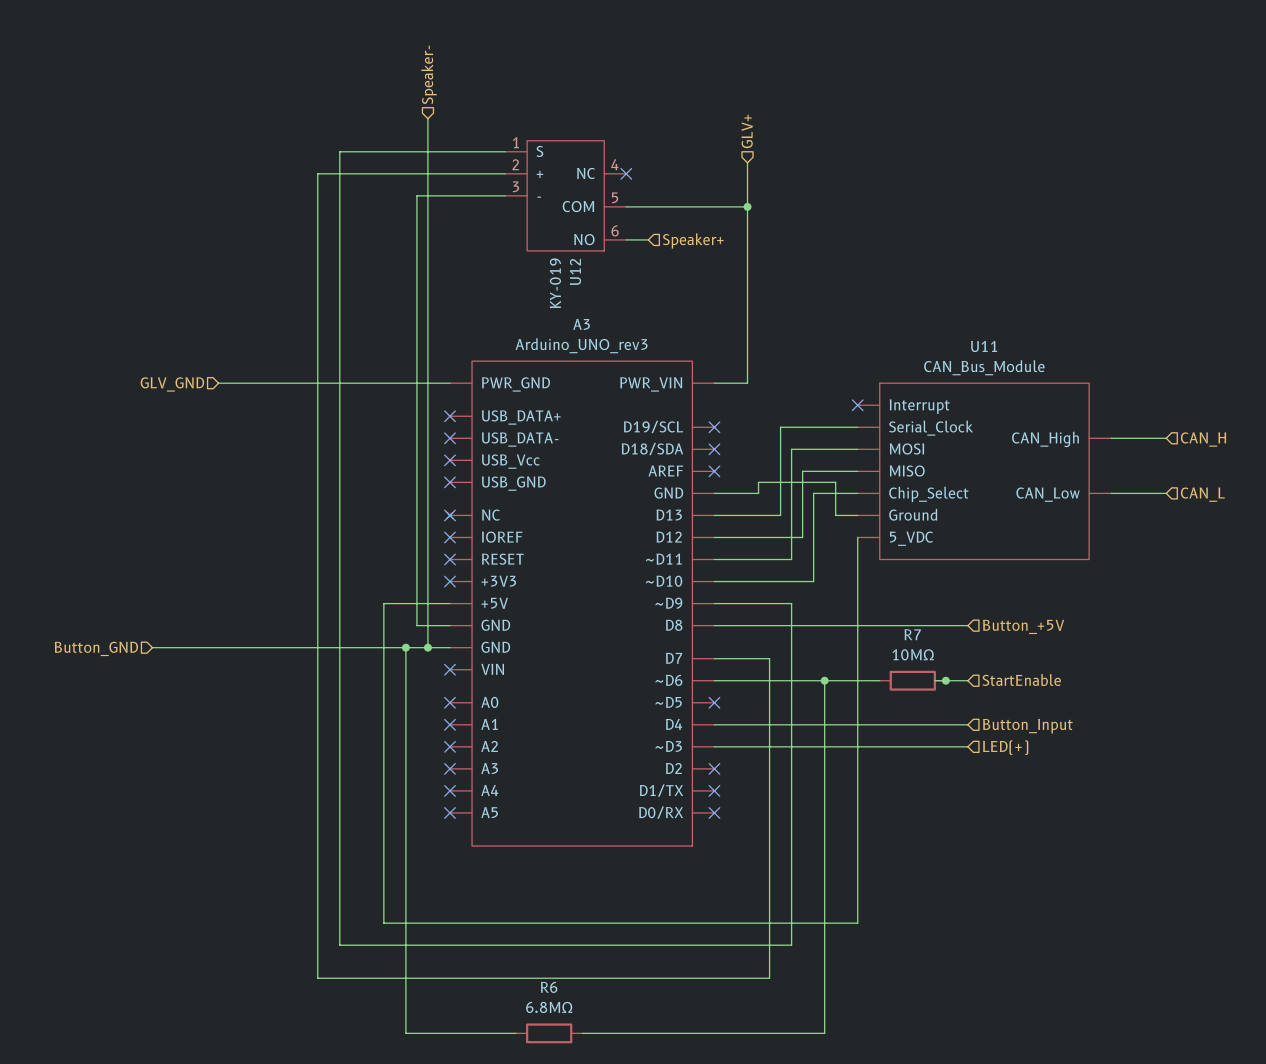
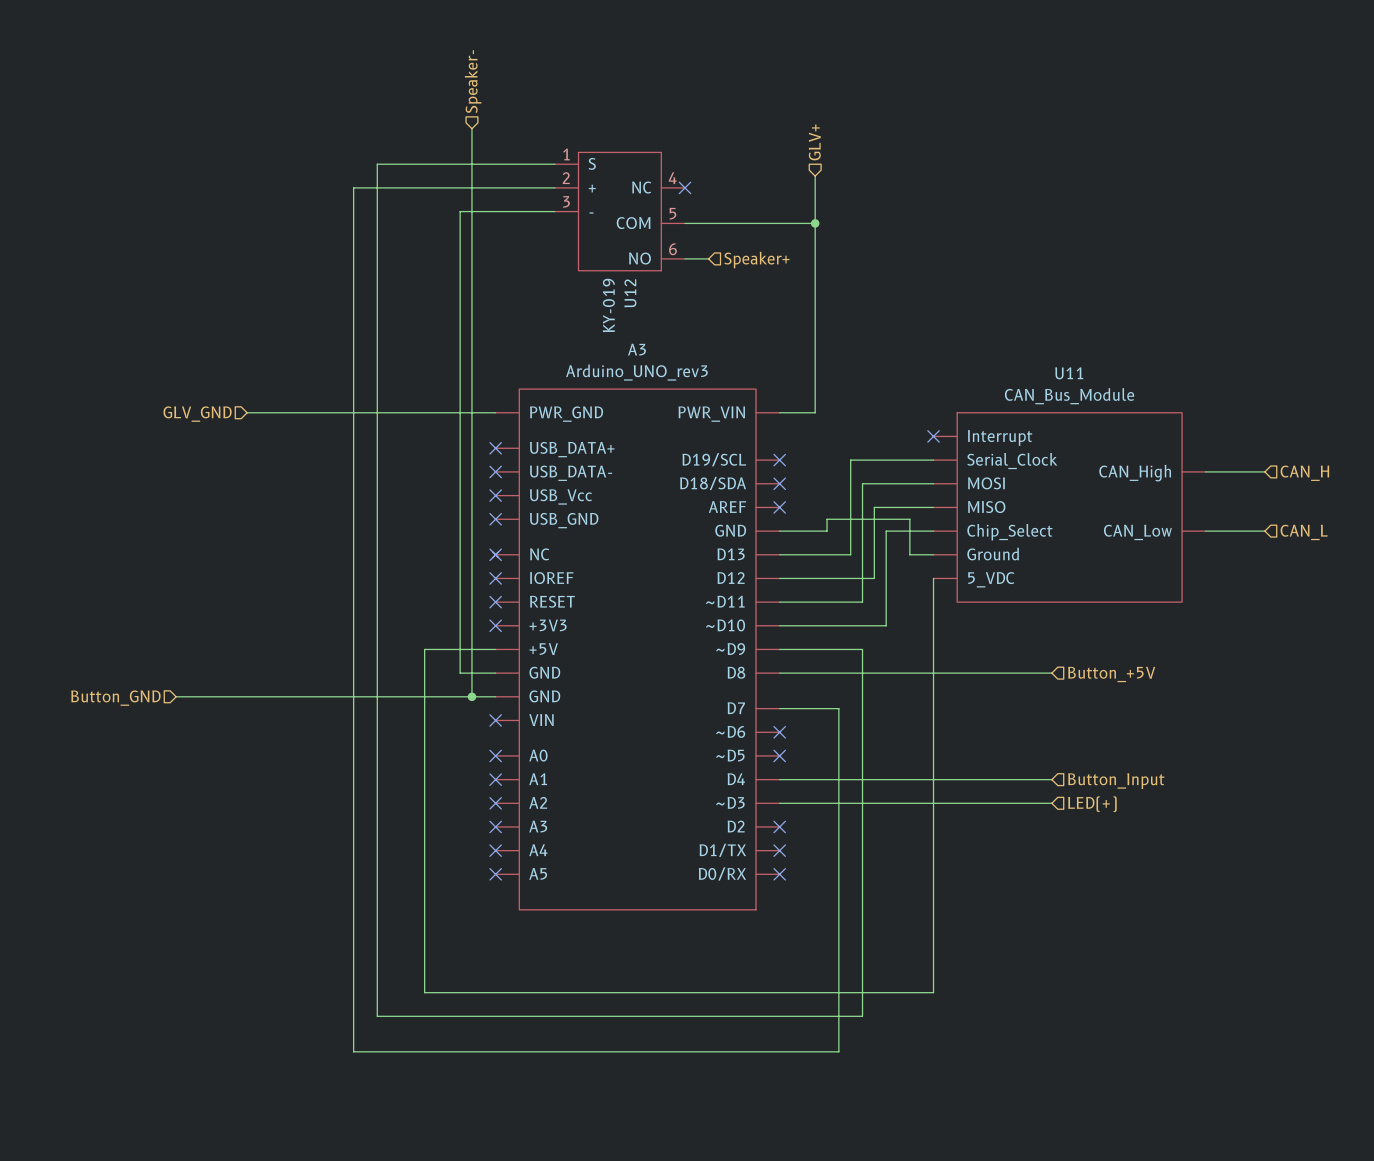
wire: (405, 647) (405, 1033) (516, 1033) -> none
junction: (405, 647) -> none
wire: (714, 680) (879, 680) -> none
no-connect mark: none -> (779, 732)
wire: (824, 680) (824, 1033) (582, 1033) -> none
junction: (824, 680) -> none
R7: 10MΩ (912, 680) -> none
wire: (934, 680) (967, 680) -> none
junction: (945, 680) -> none
hierarchical label: StartEnable (1021, 680) -> none
R6: 6.8MΩ (549, 1033) -> none

